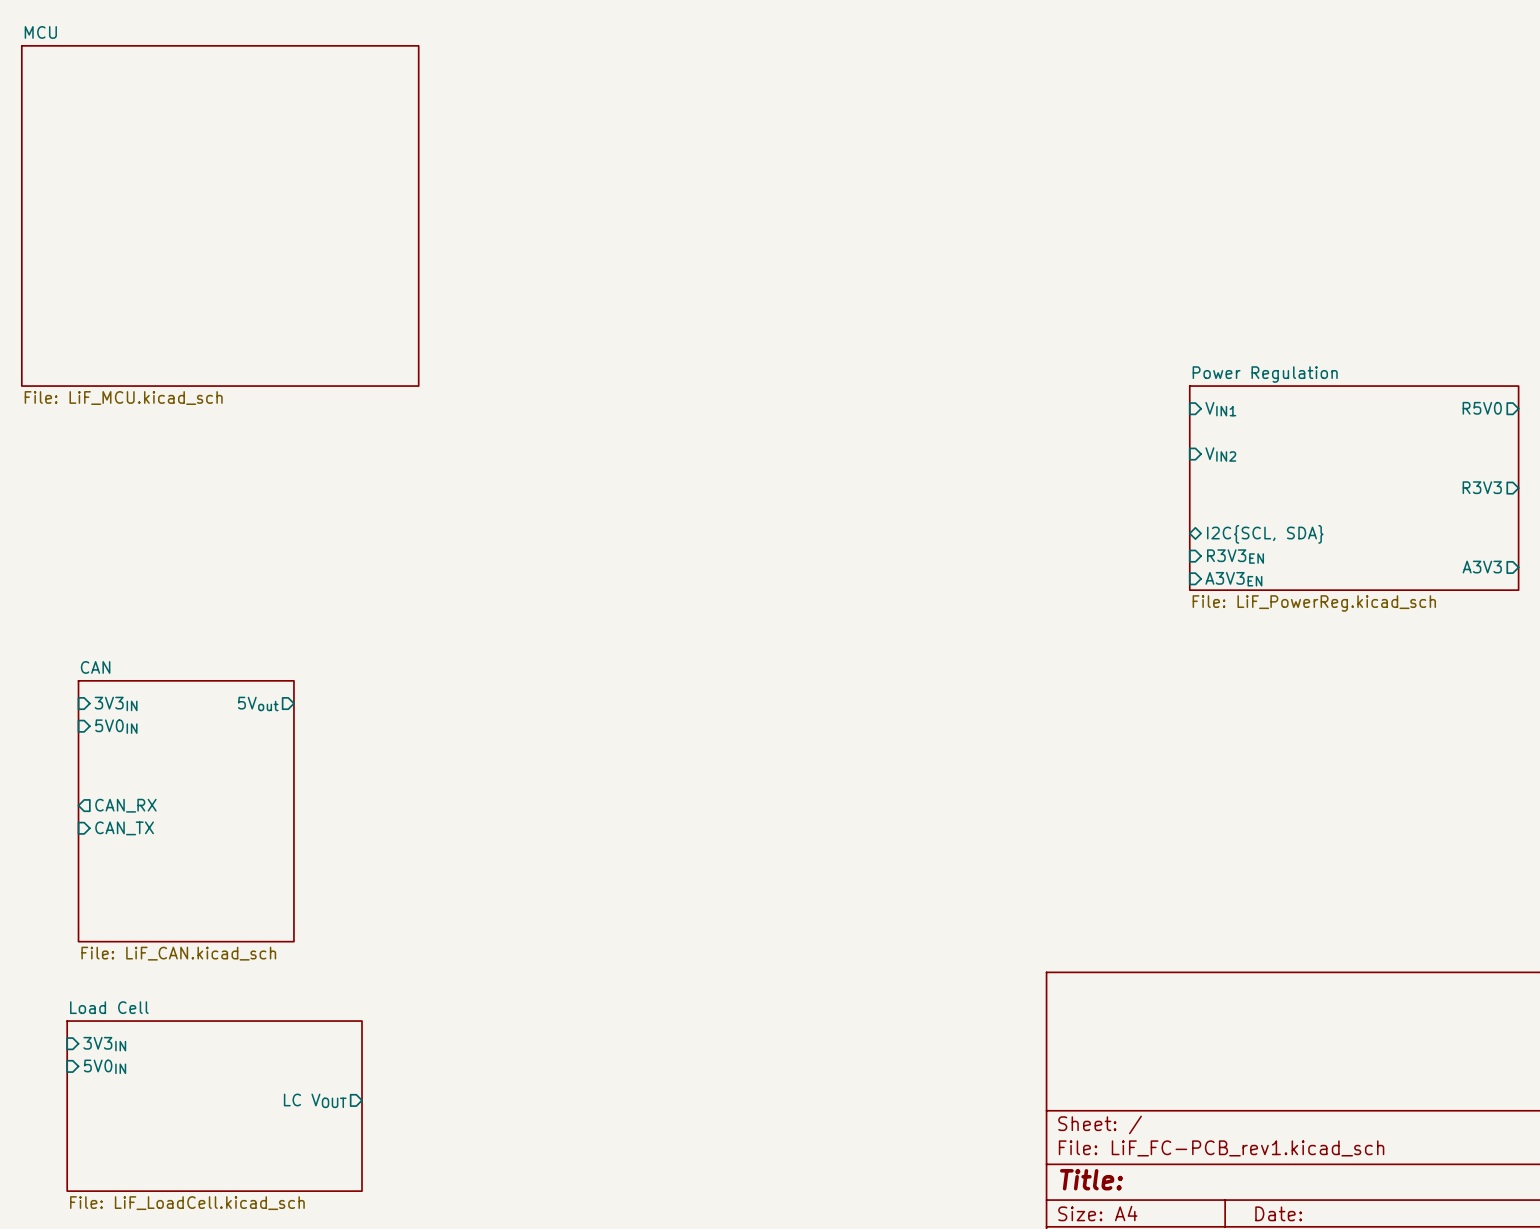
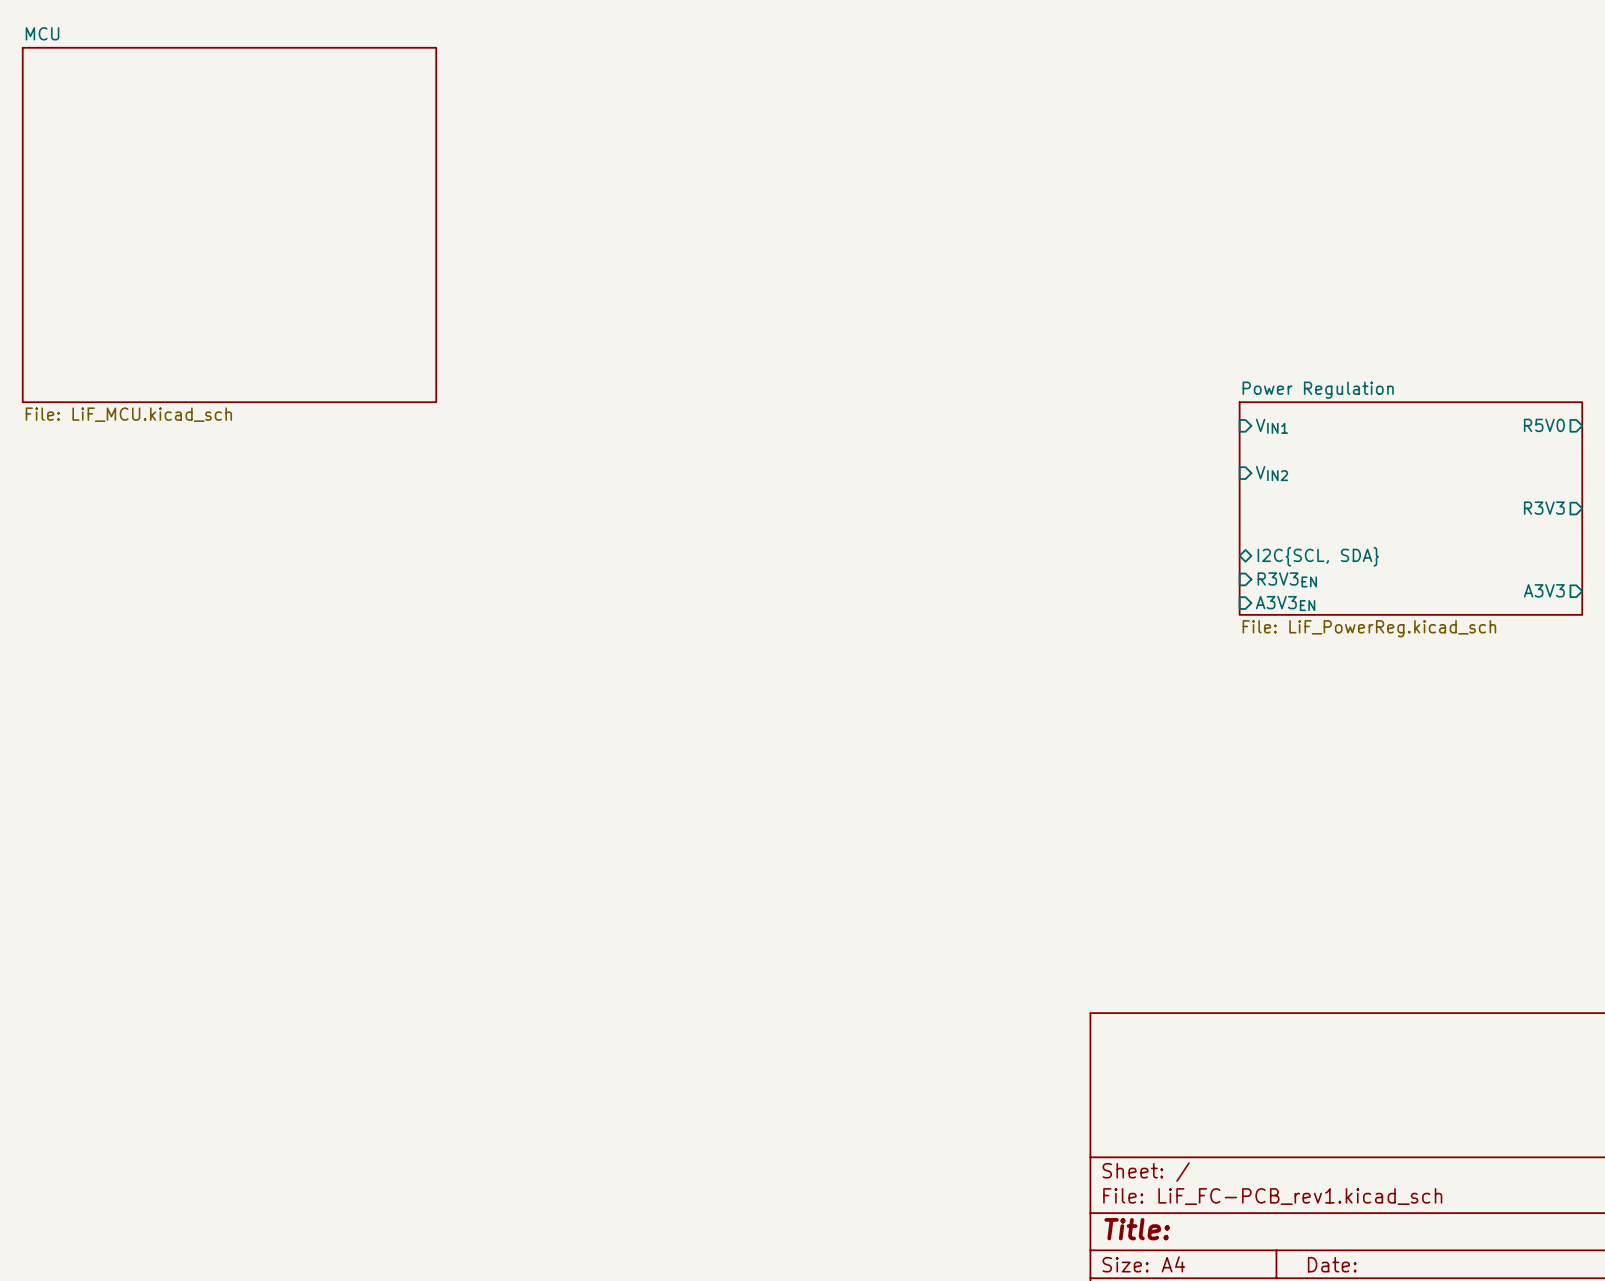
sheet pin: 3V3IN (116, 703) -> none
sheet pin: 5Vout (258, 703) -> none
sheet pin: 5V0IN (116, 726) -> none
sheet pin: CAN_RX (125, 805) -> none
sheet CAN: File: LiF_CAN.kicad_sch (186, 811) -> none
sheet pin: CAN_TX (124, 828) -> none
sheet pin: 3V3IN (104, 1044) -> none
sheet pin: 5V0IN (105, 1066) -> none
sheet pin: LC VOUT (315, 1100) -> none
sheet Load Cell: File: LiF_LoadCell.kicad_sch (214, 1106) -> none

